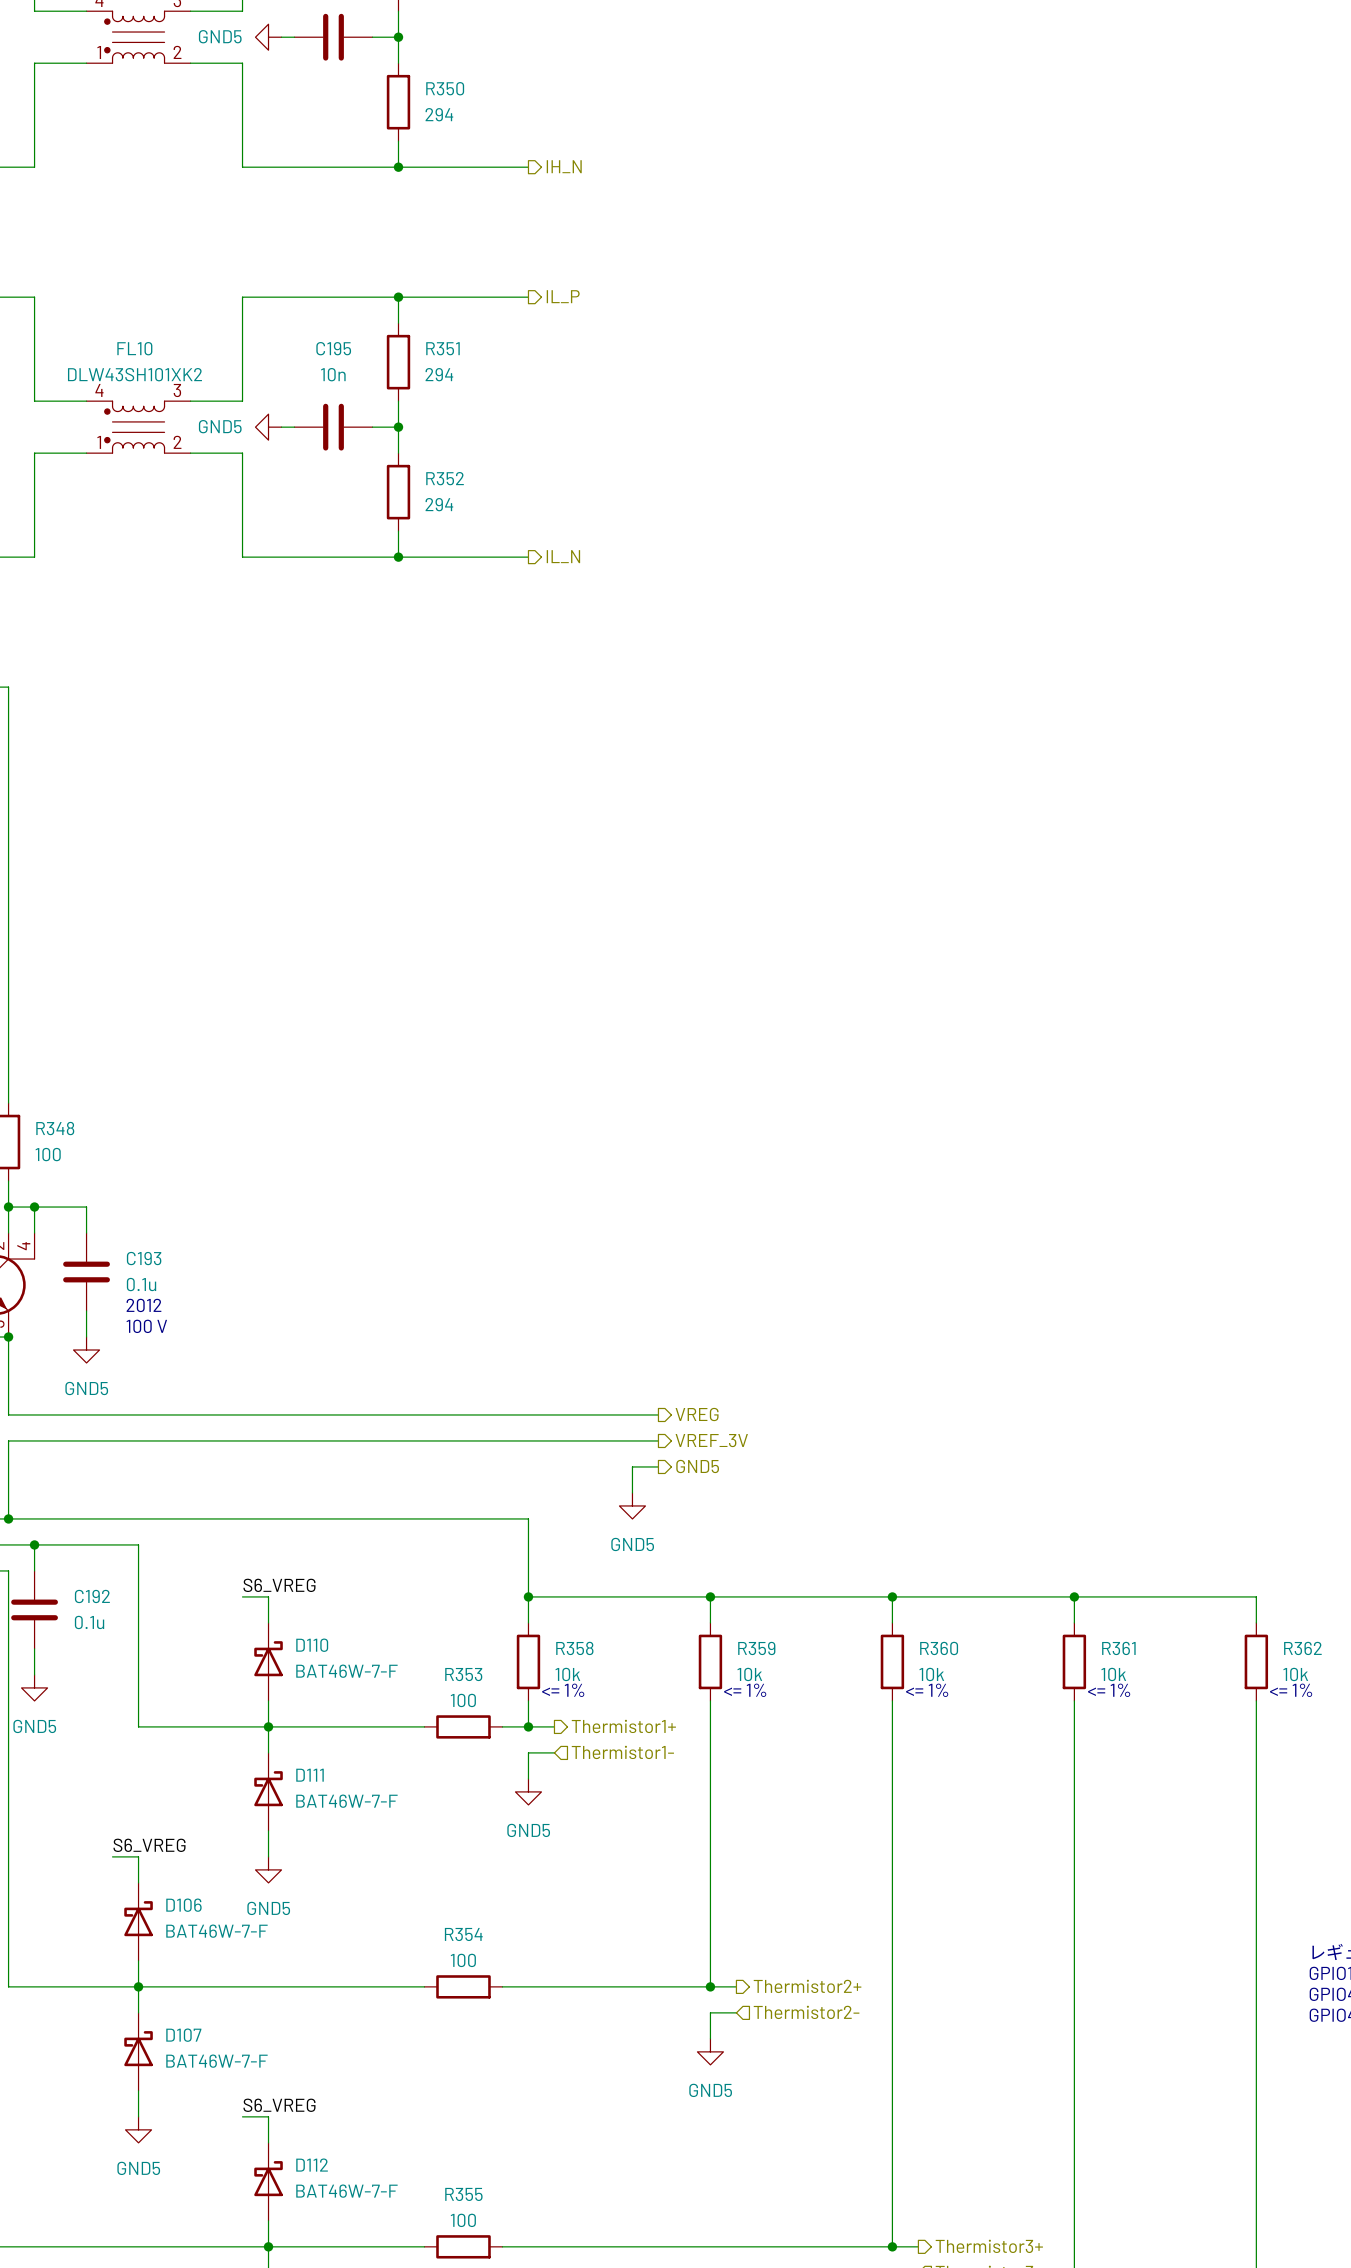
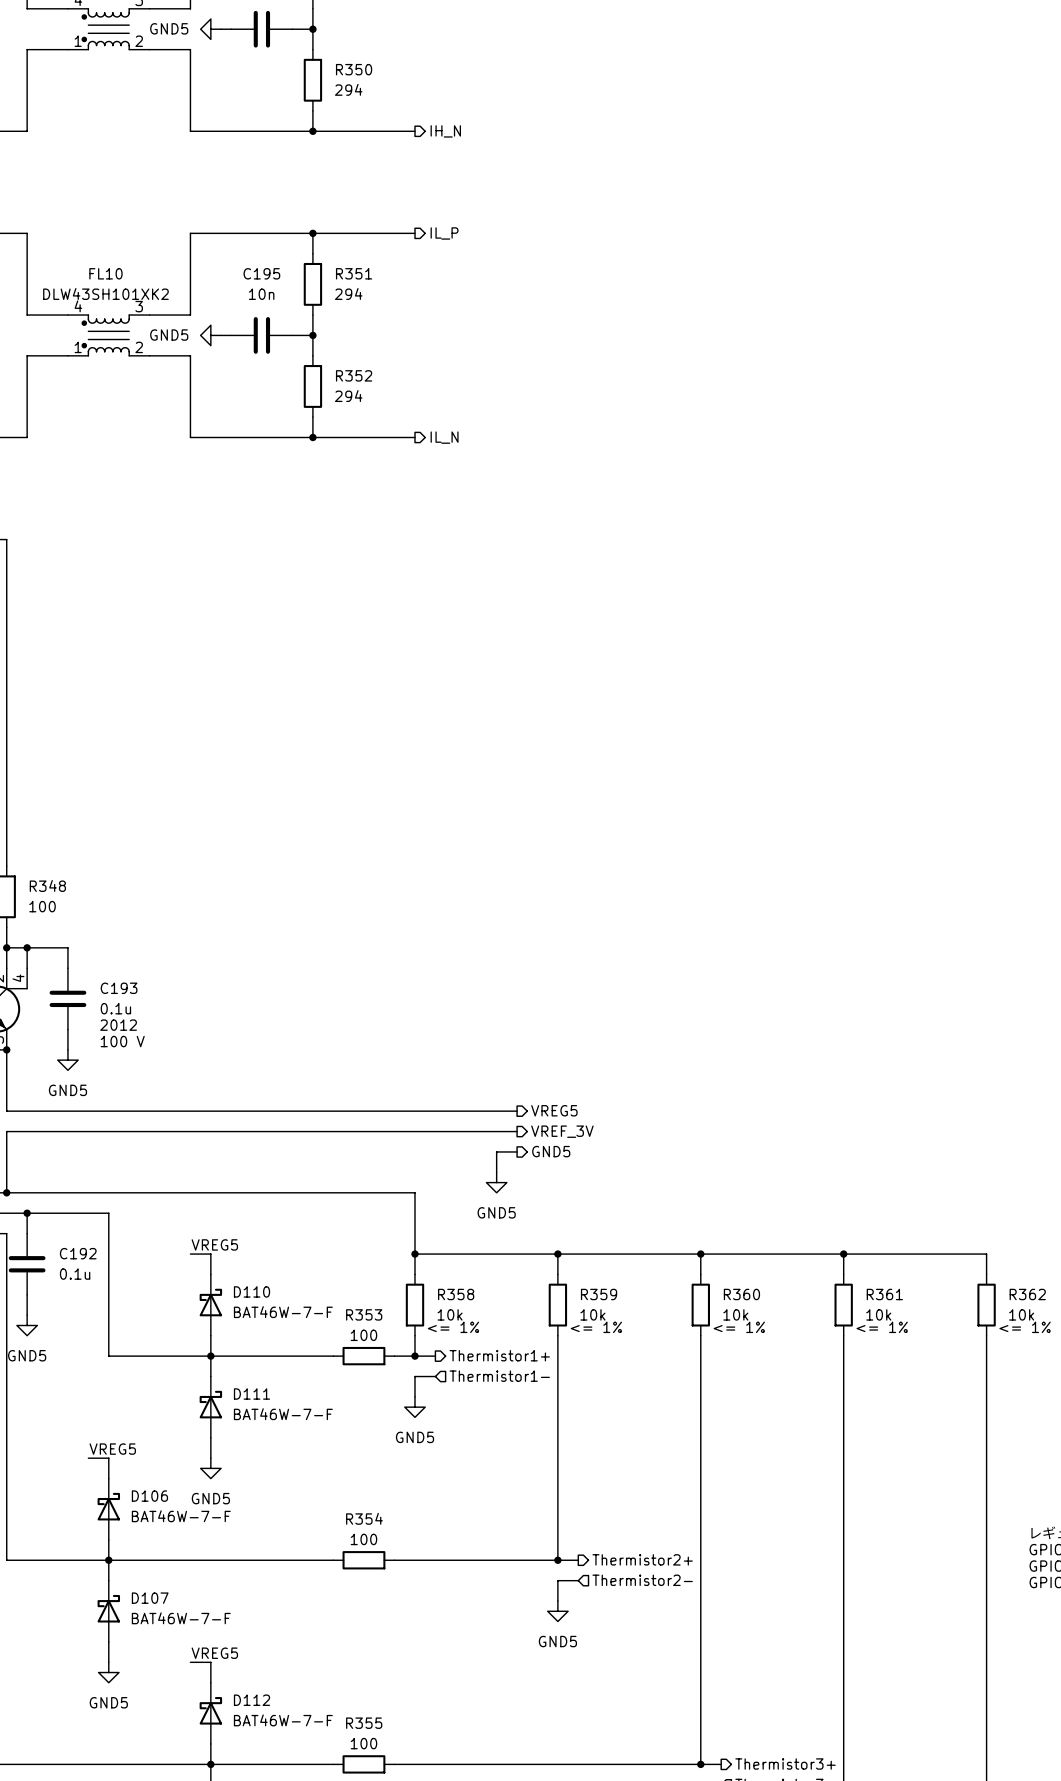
hierarchical label: VREG (697, 1414) -> VREG5 (554, 1110)
label: S6_VREG (279, 1585) -> VREG5 (214, 1244)
label: S6_VREG (149, 1845) -> VREG5 (112, 1449)
label: S6_VREG (279, 2105) -> VREG5 (214, 1653)

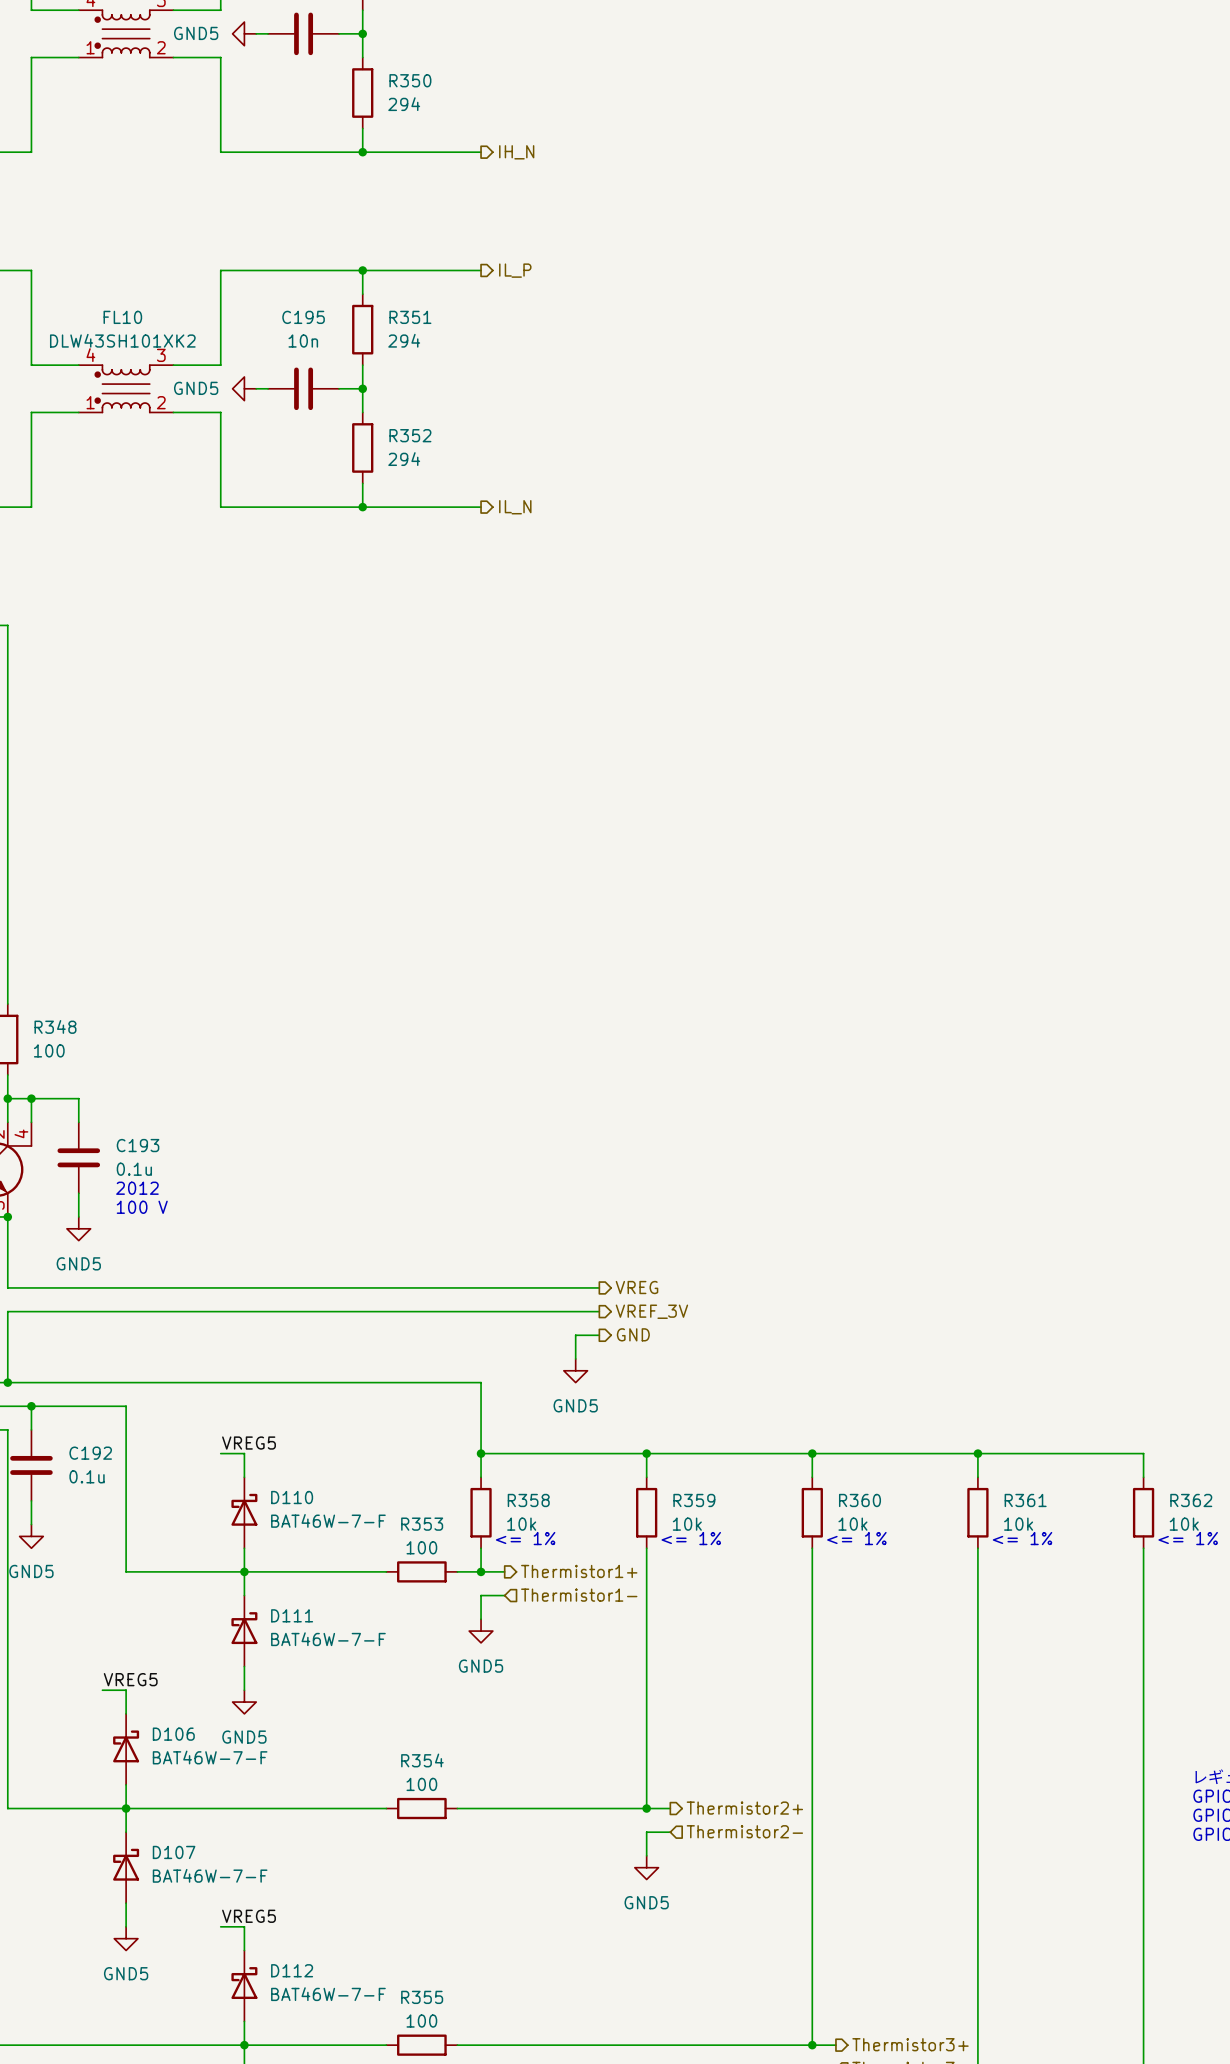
hierarchical label: VREG5 (554, 1110) -> VREG (636, 1287)
hierarchical label: GND5 (551, 1151) -> GND (633, 1334)

